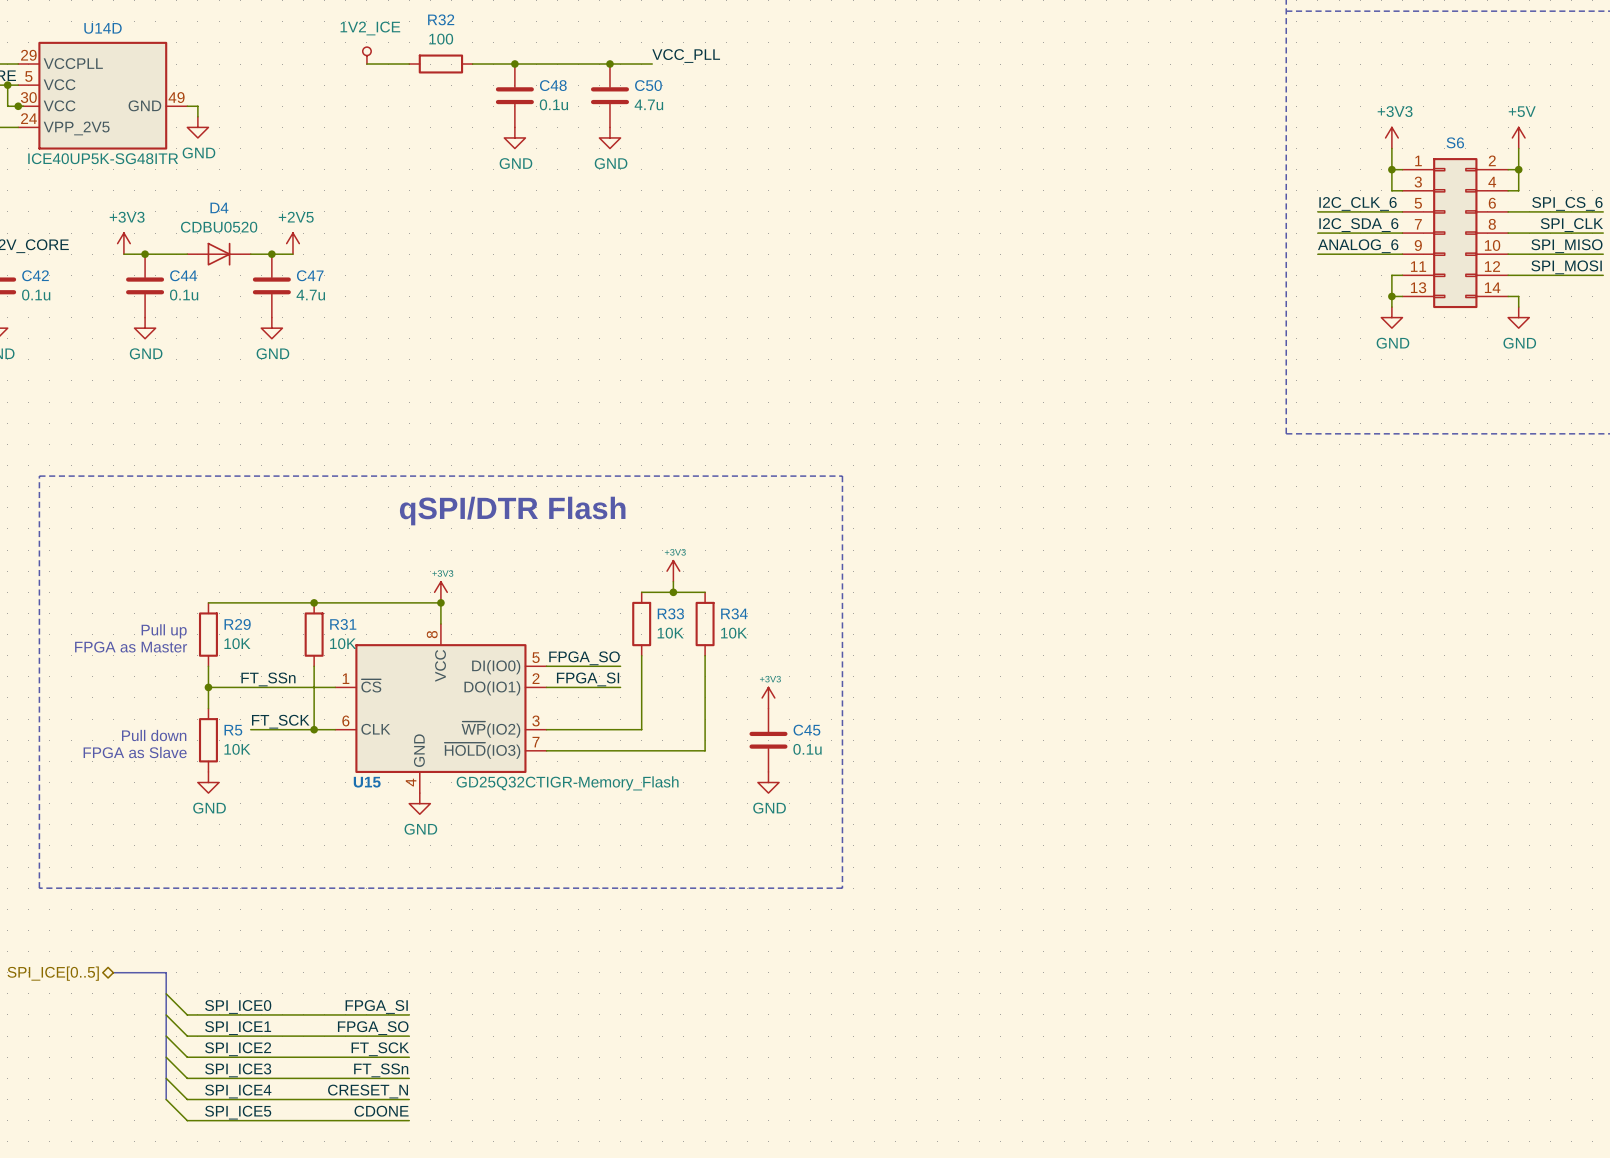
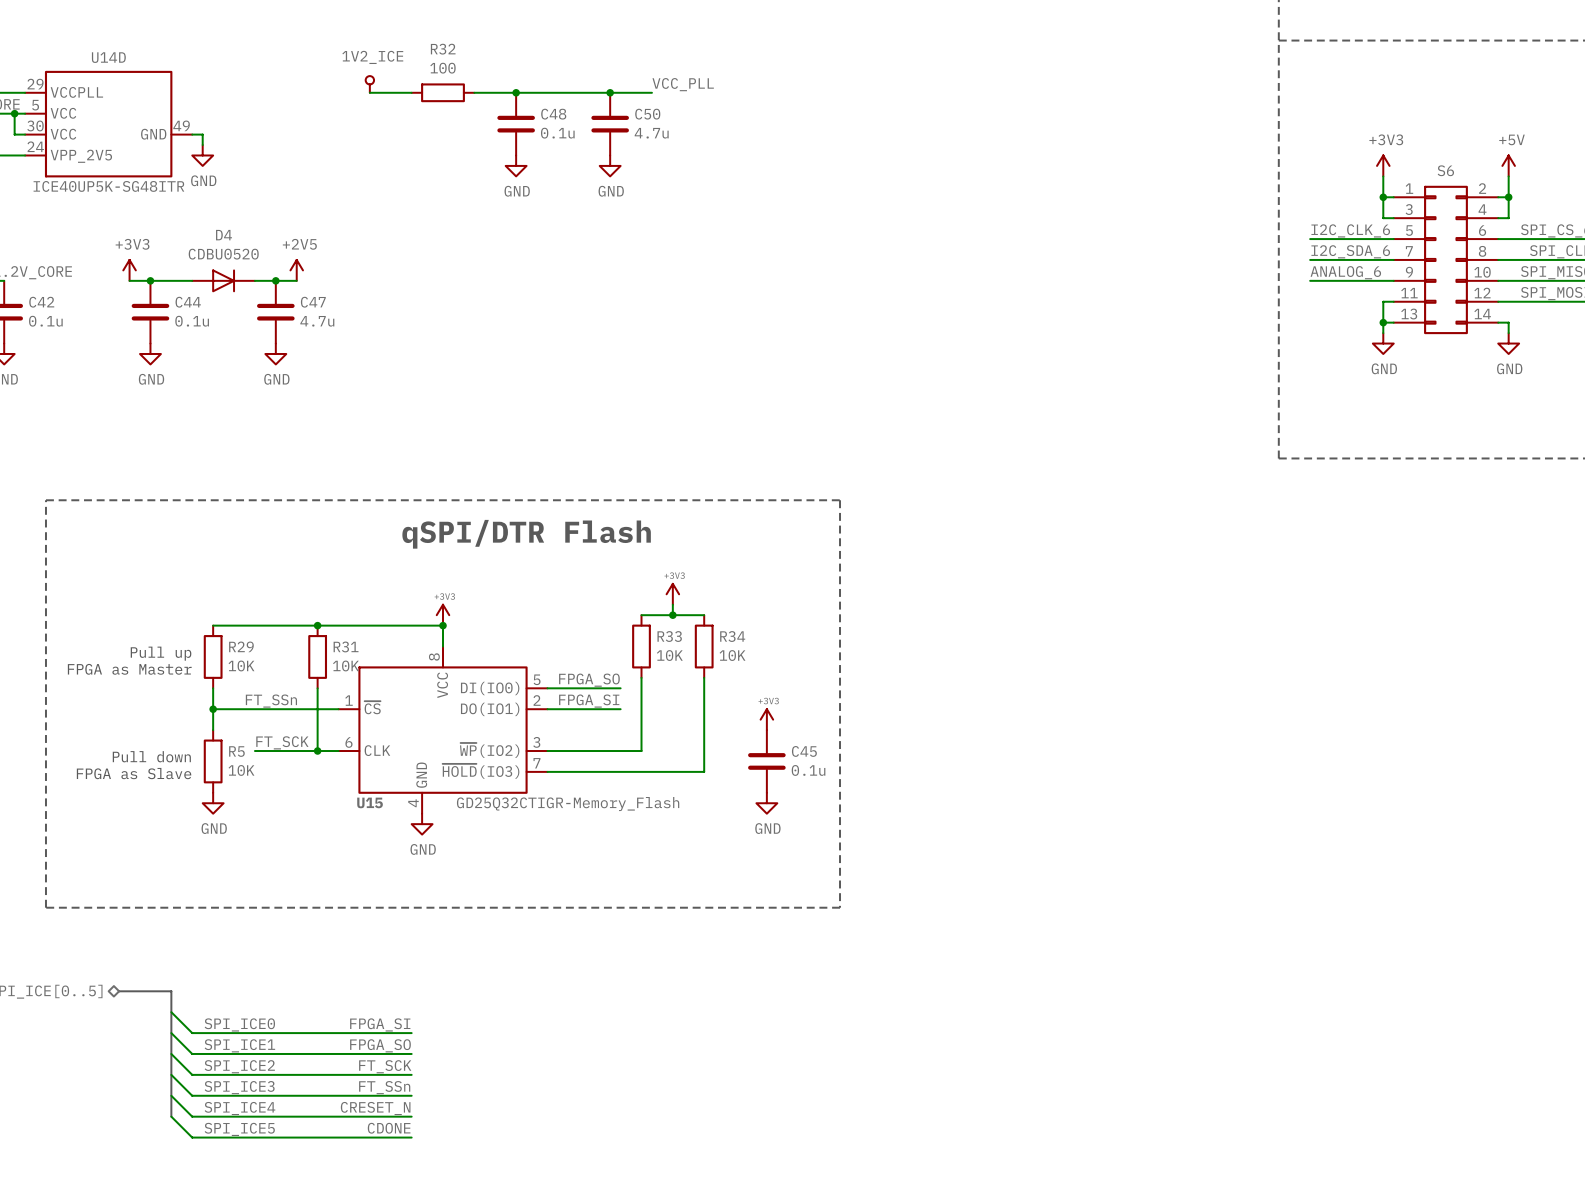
junction: (18, 106) -> none

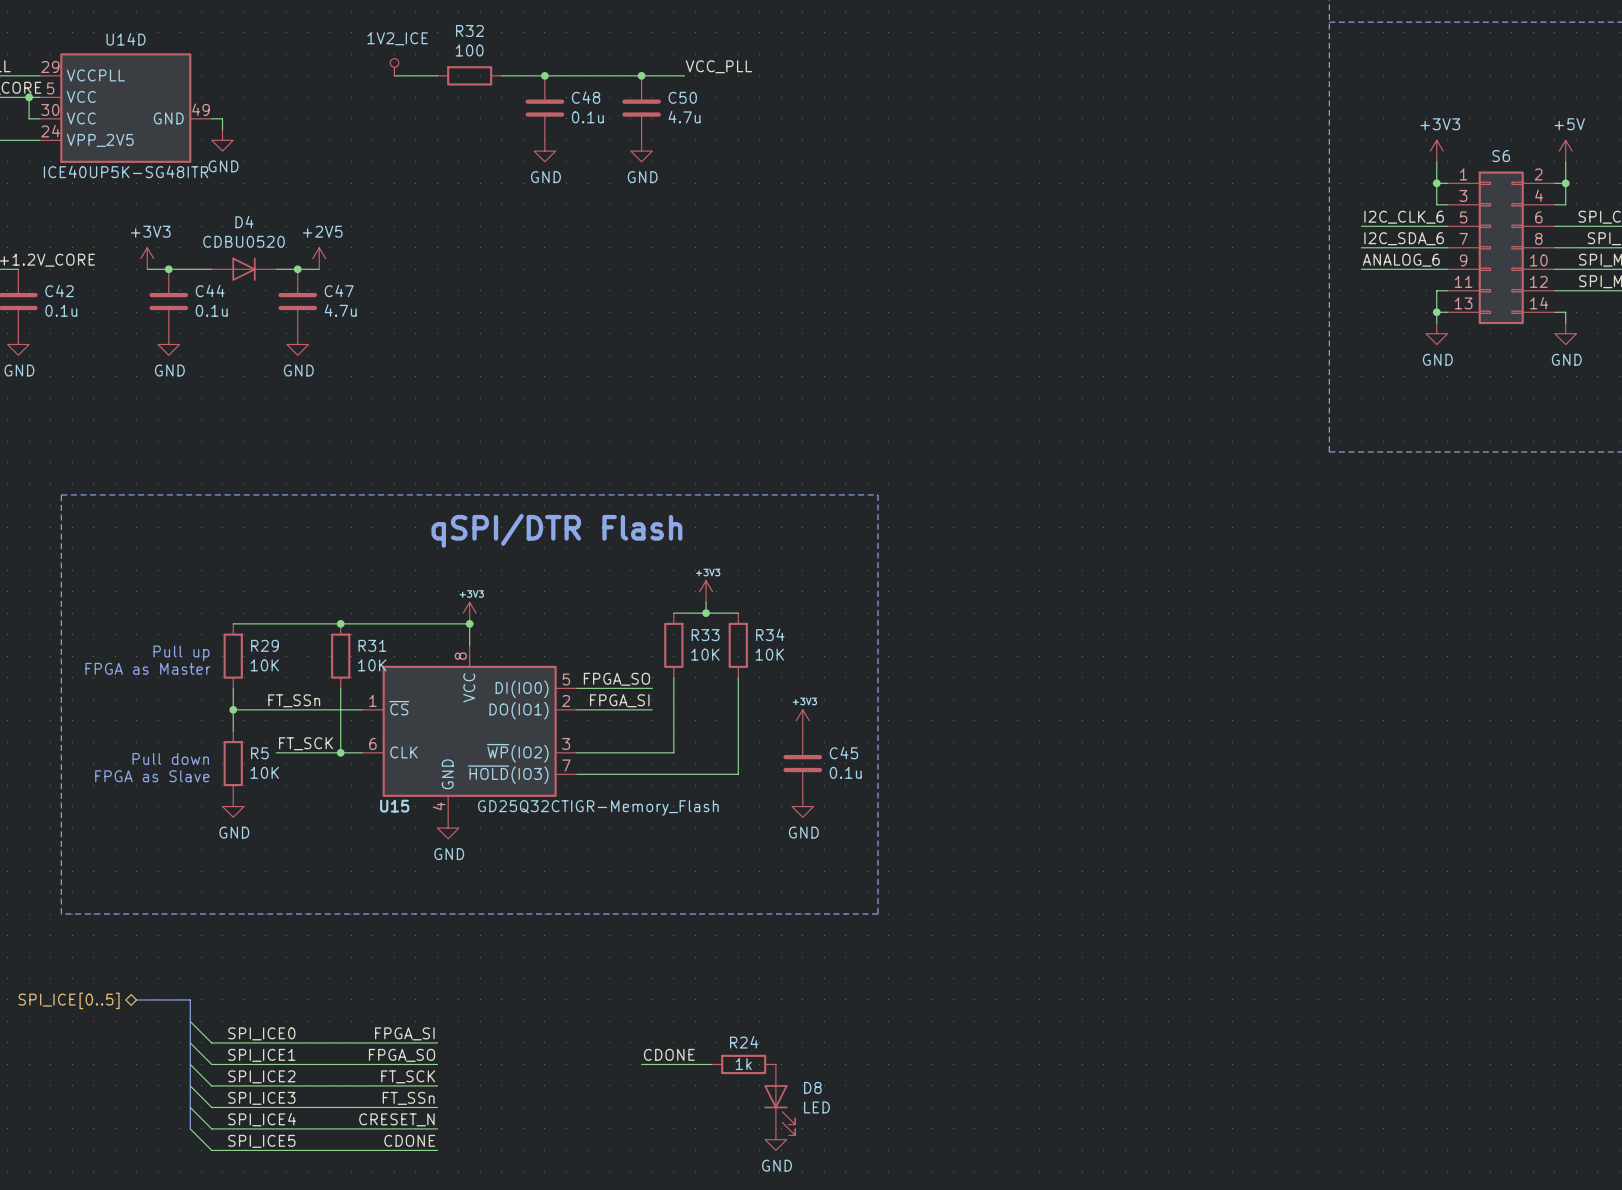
label: none -> CDONE (669, 1054)
wire: none -> (641, 1064) (711, 1064)
R24: none -> 1k (743, 1064)
D8: none -> LED (779, 1099)
power symbol: none -> GND (775, 1139)

